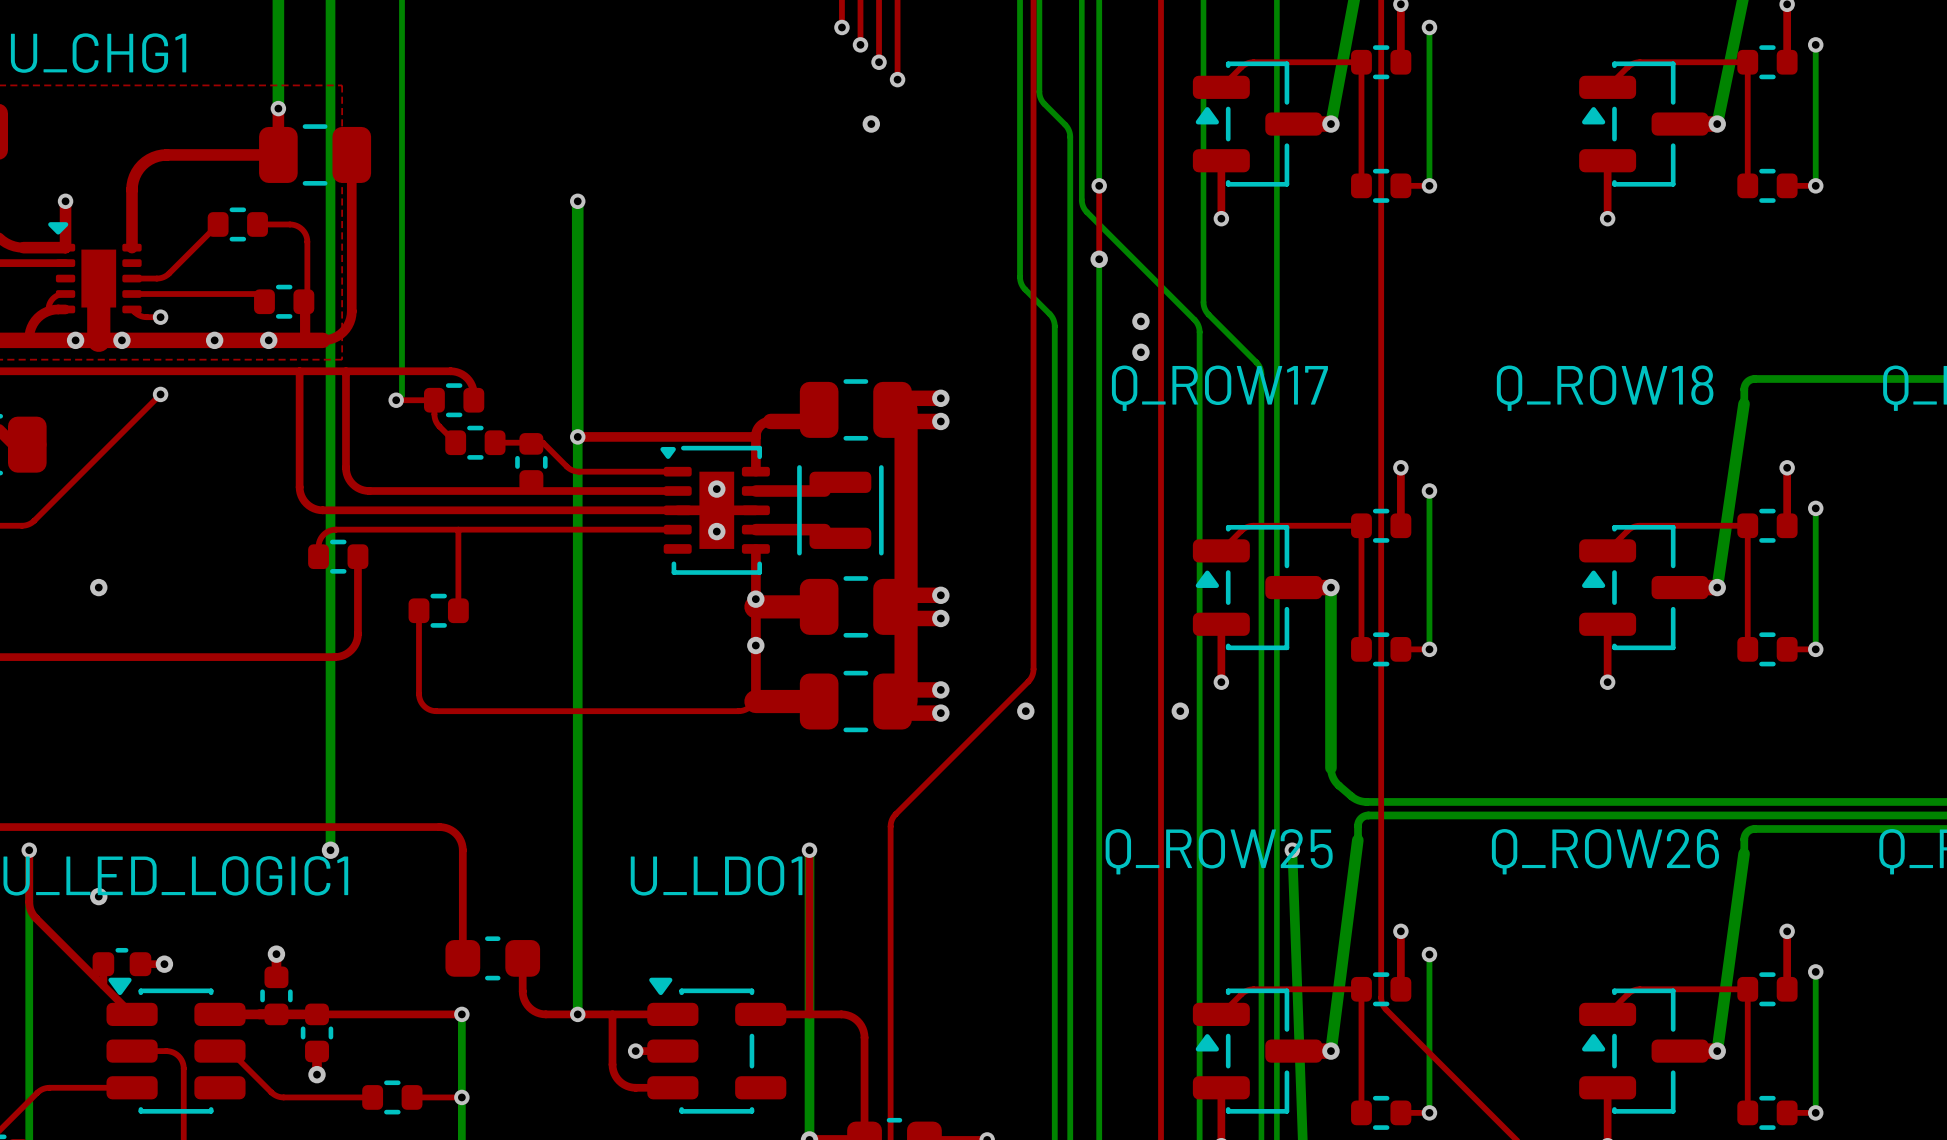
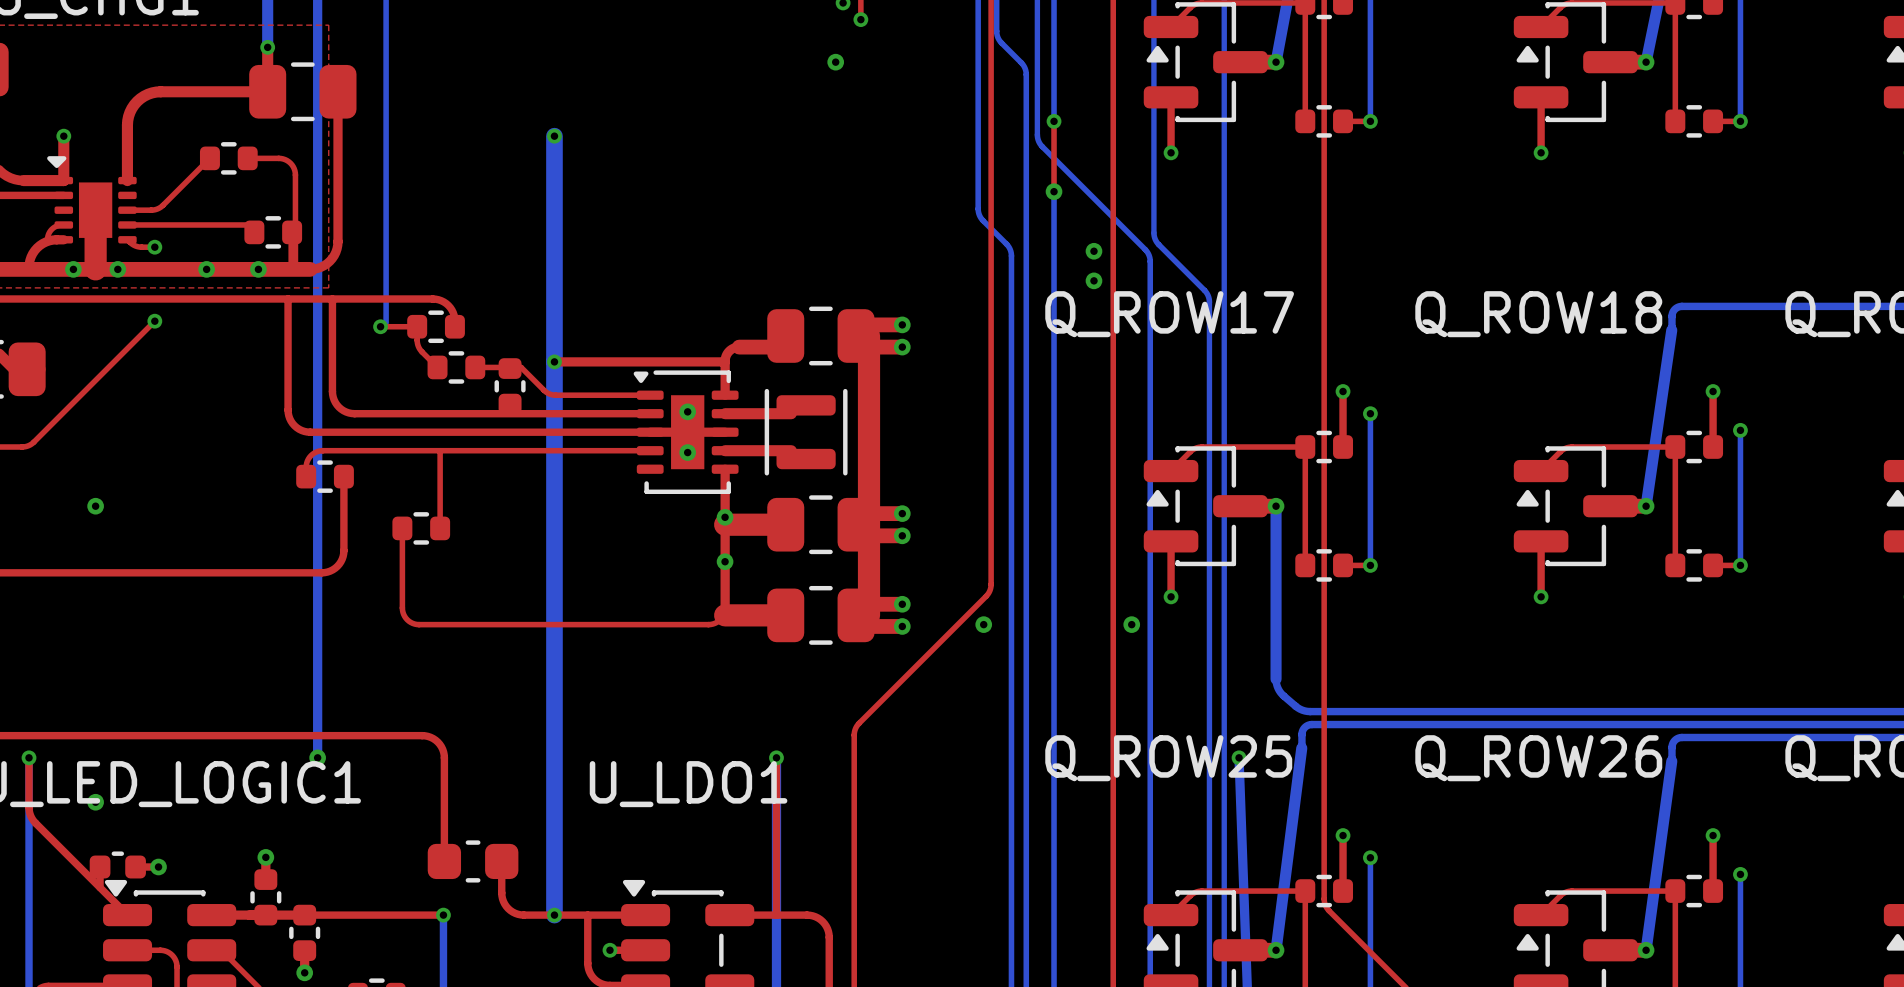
bottom track width: thin (577, 201) (577, 1014) -> thick (554, 136) (554, 915)

